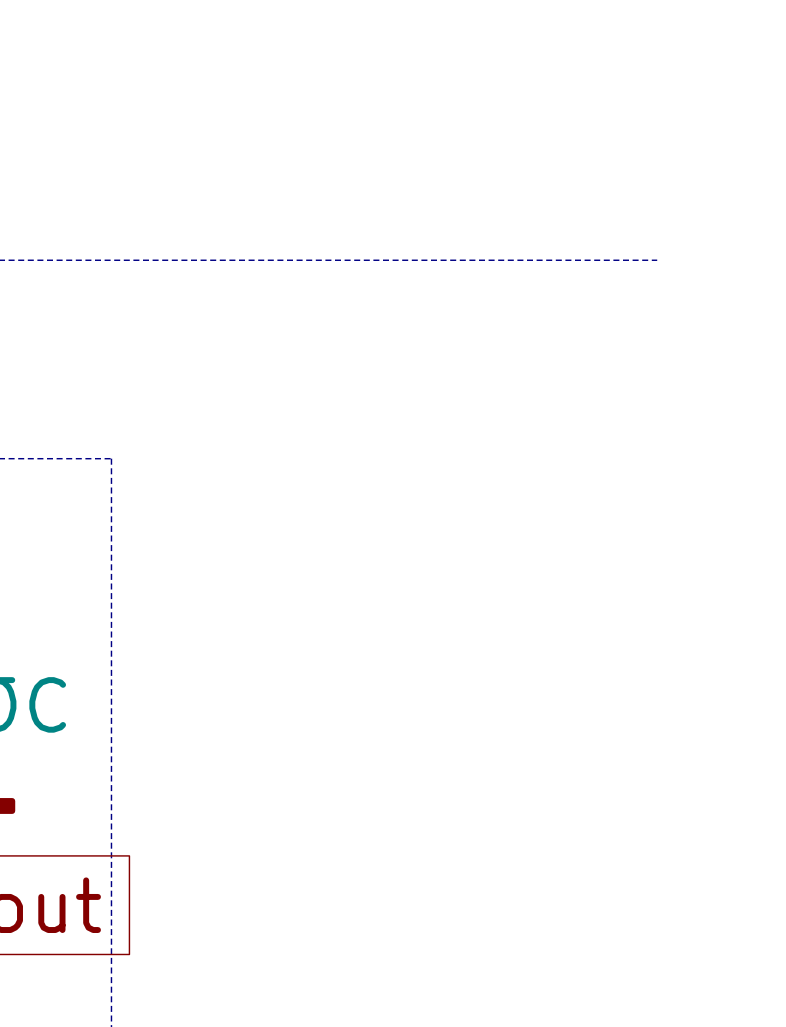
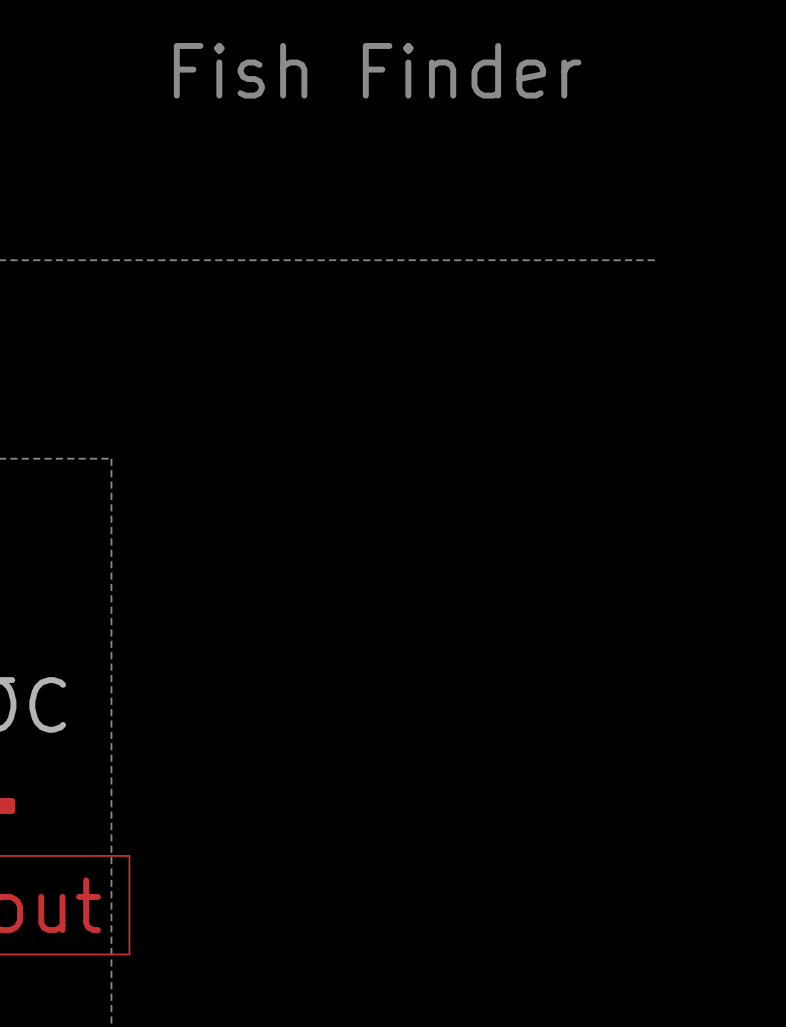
text: none -> Fish Finder (377, 70)

